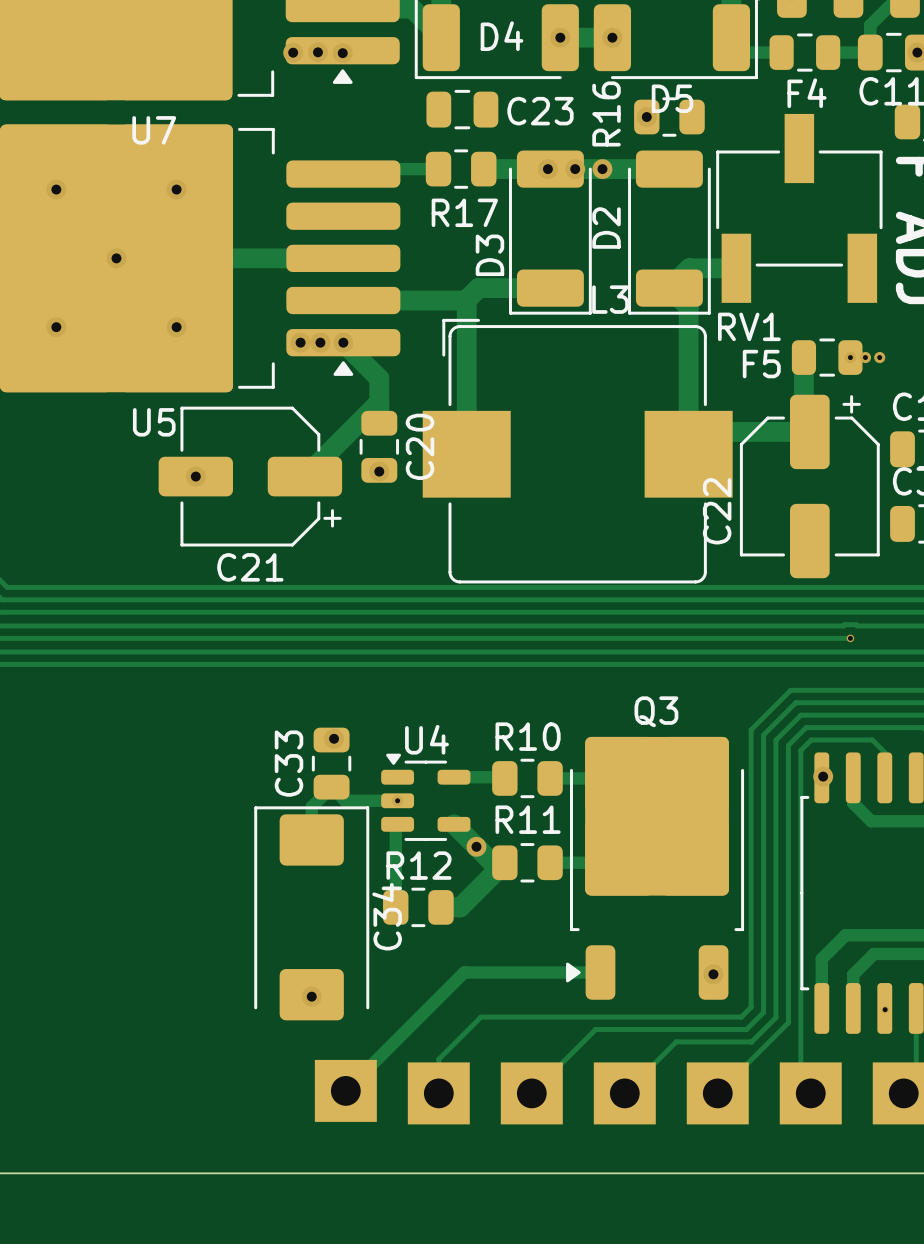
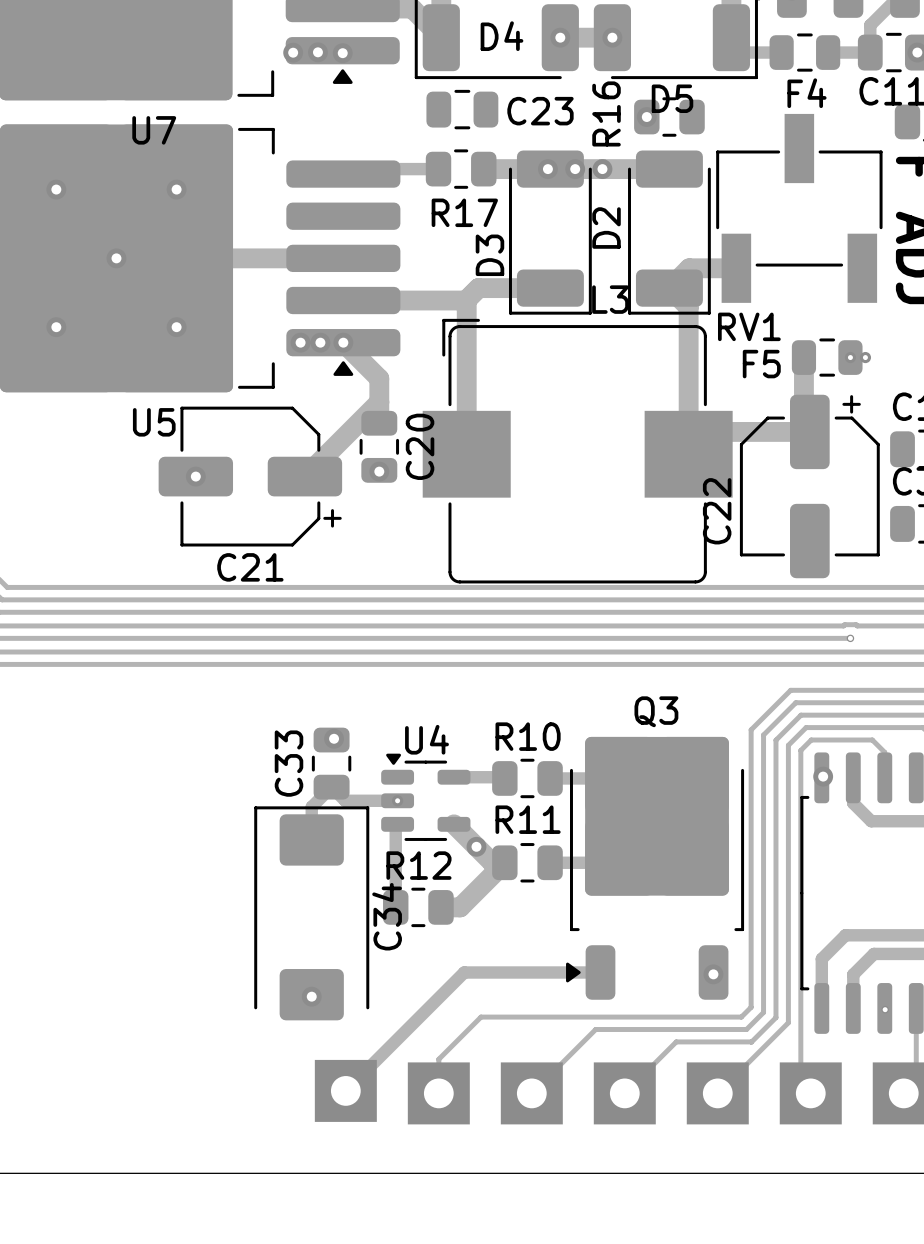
via: (879, 357) -> none

